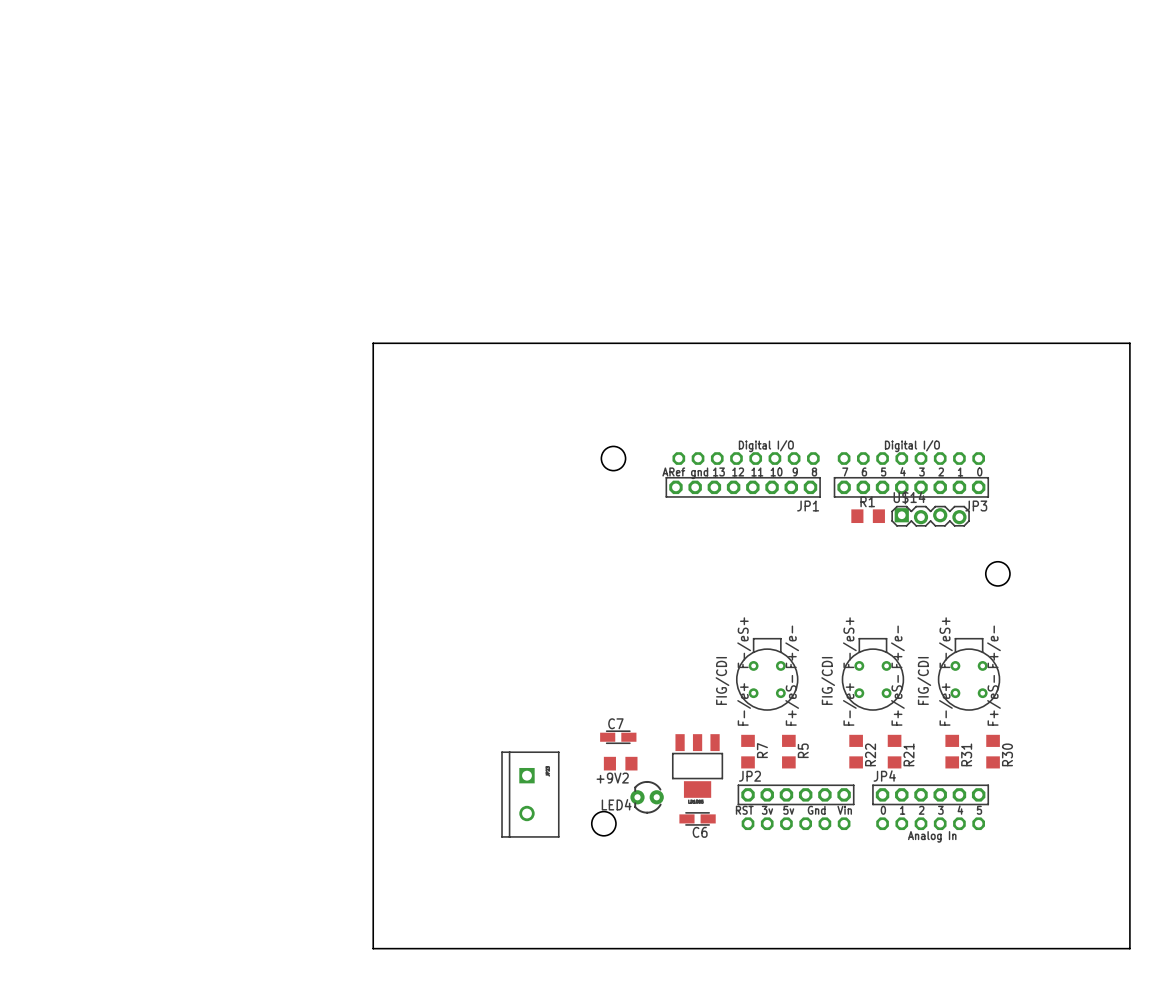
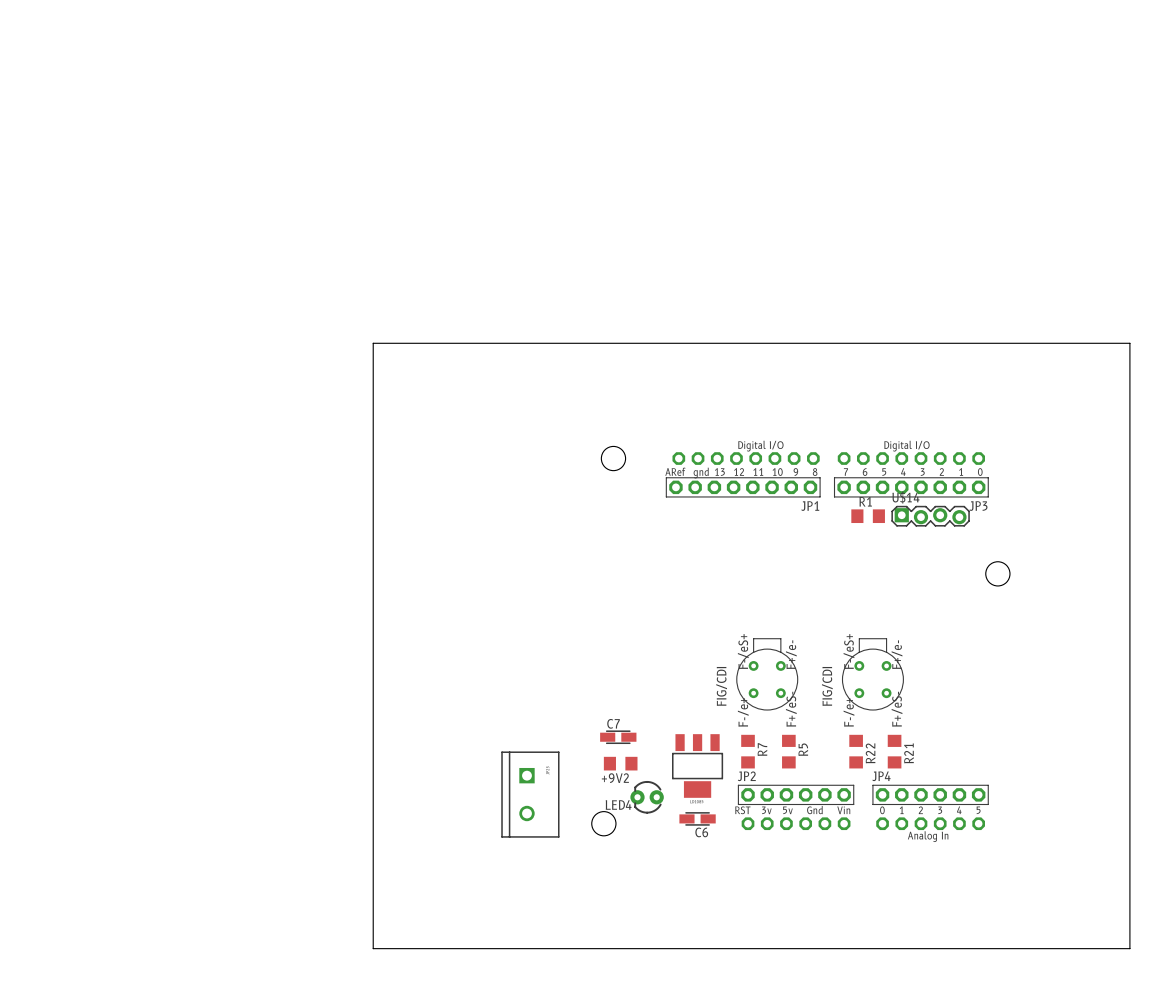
part: (969, 674) -> none
R31: (952, 751) -> none
R30: (993, 751) -> none

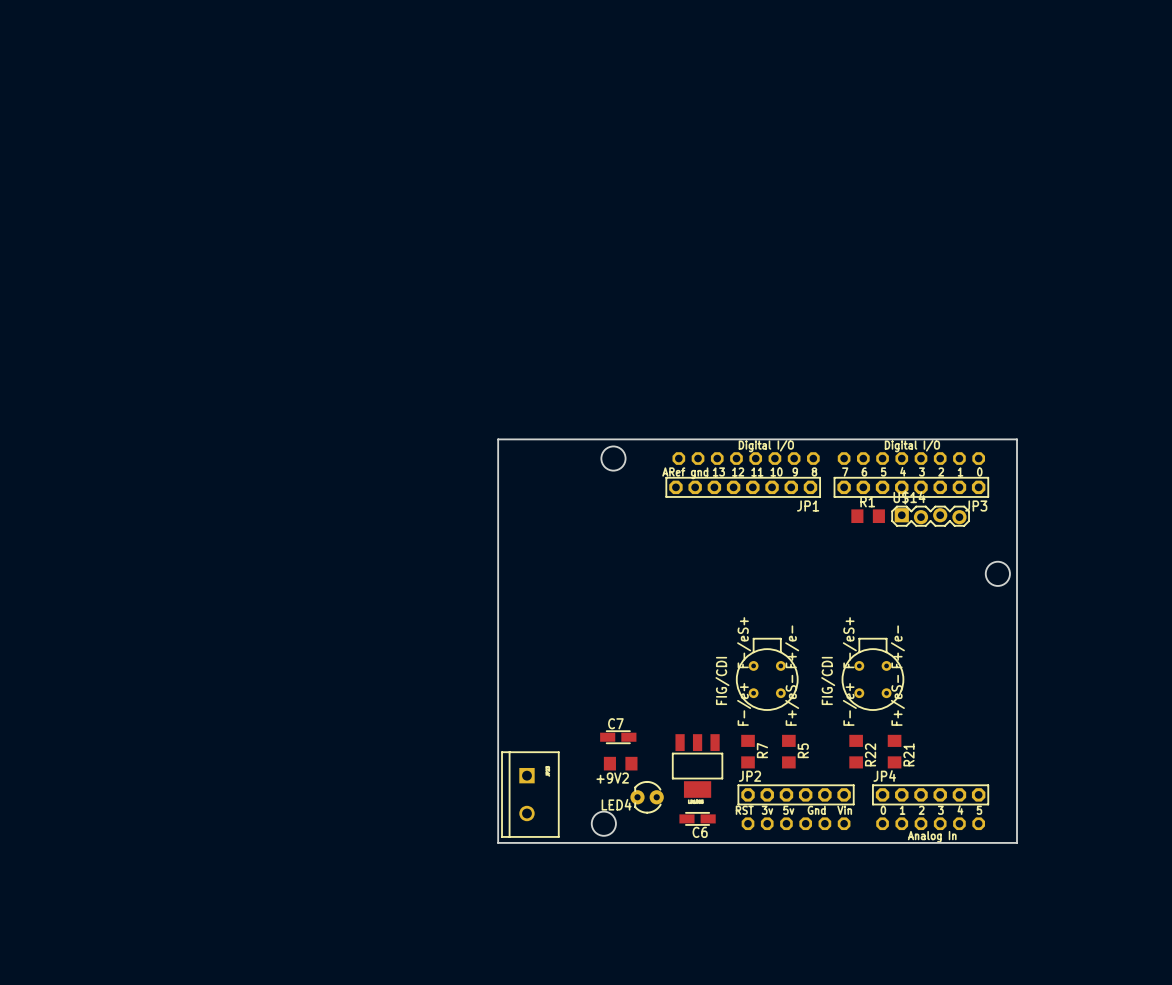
board edge: (373, 343) (1129, 343) (1129, 948) (373, 948) (373, 343) -> none
board edge: none -> (498, 439) (1017, 439) (1017, 842) (498, 842) (498, 439)

